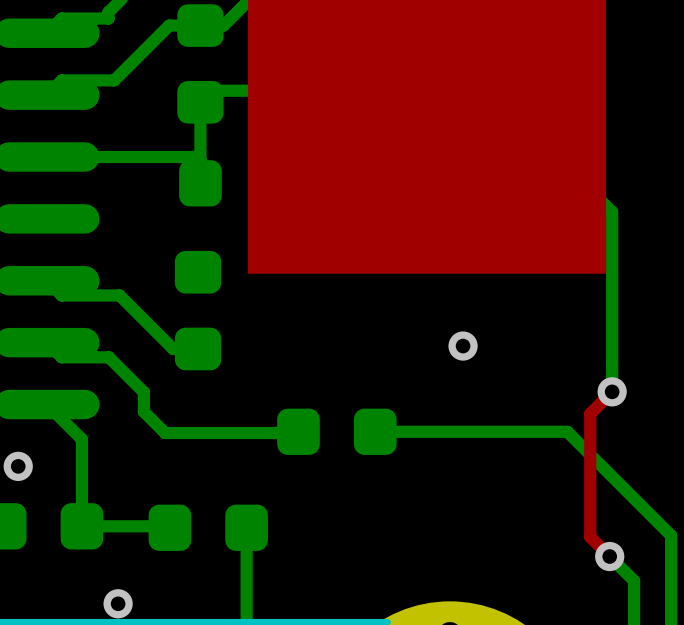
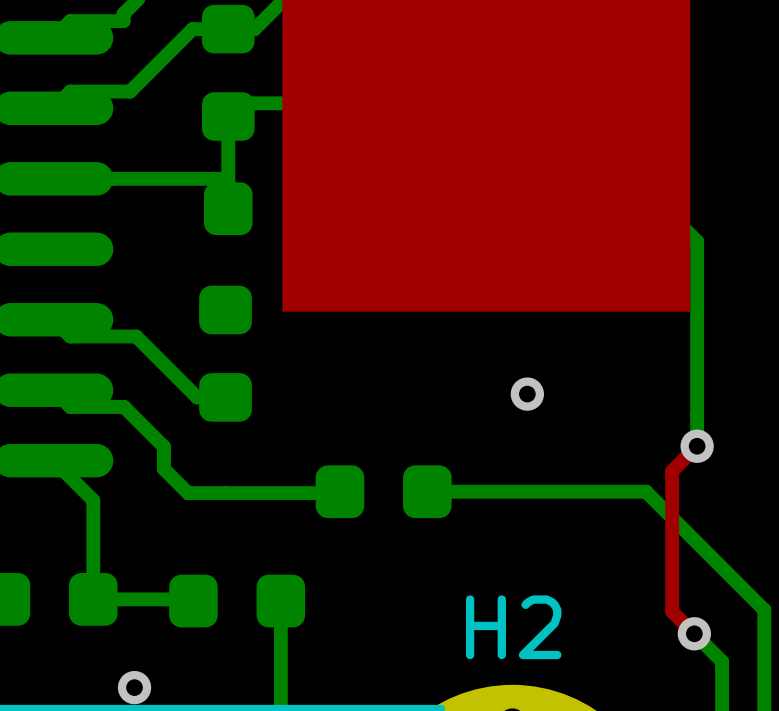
via: (18, 466) -> none
H2 name: none -> H2 (513, 627)

